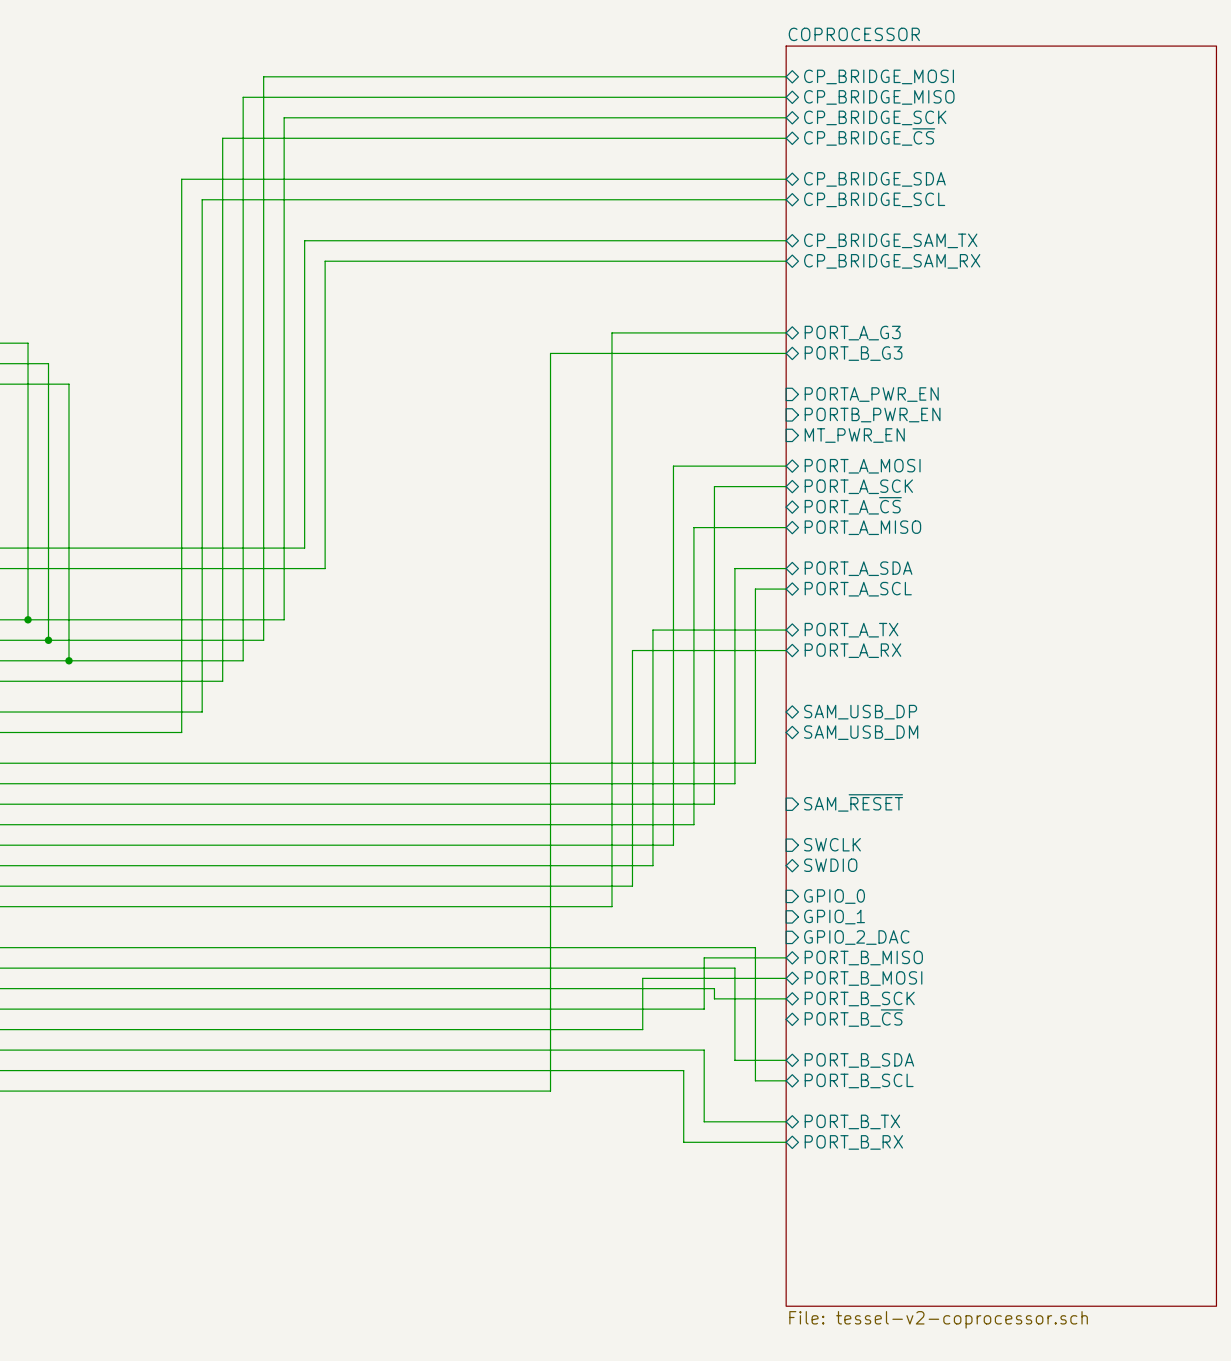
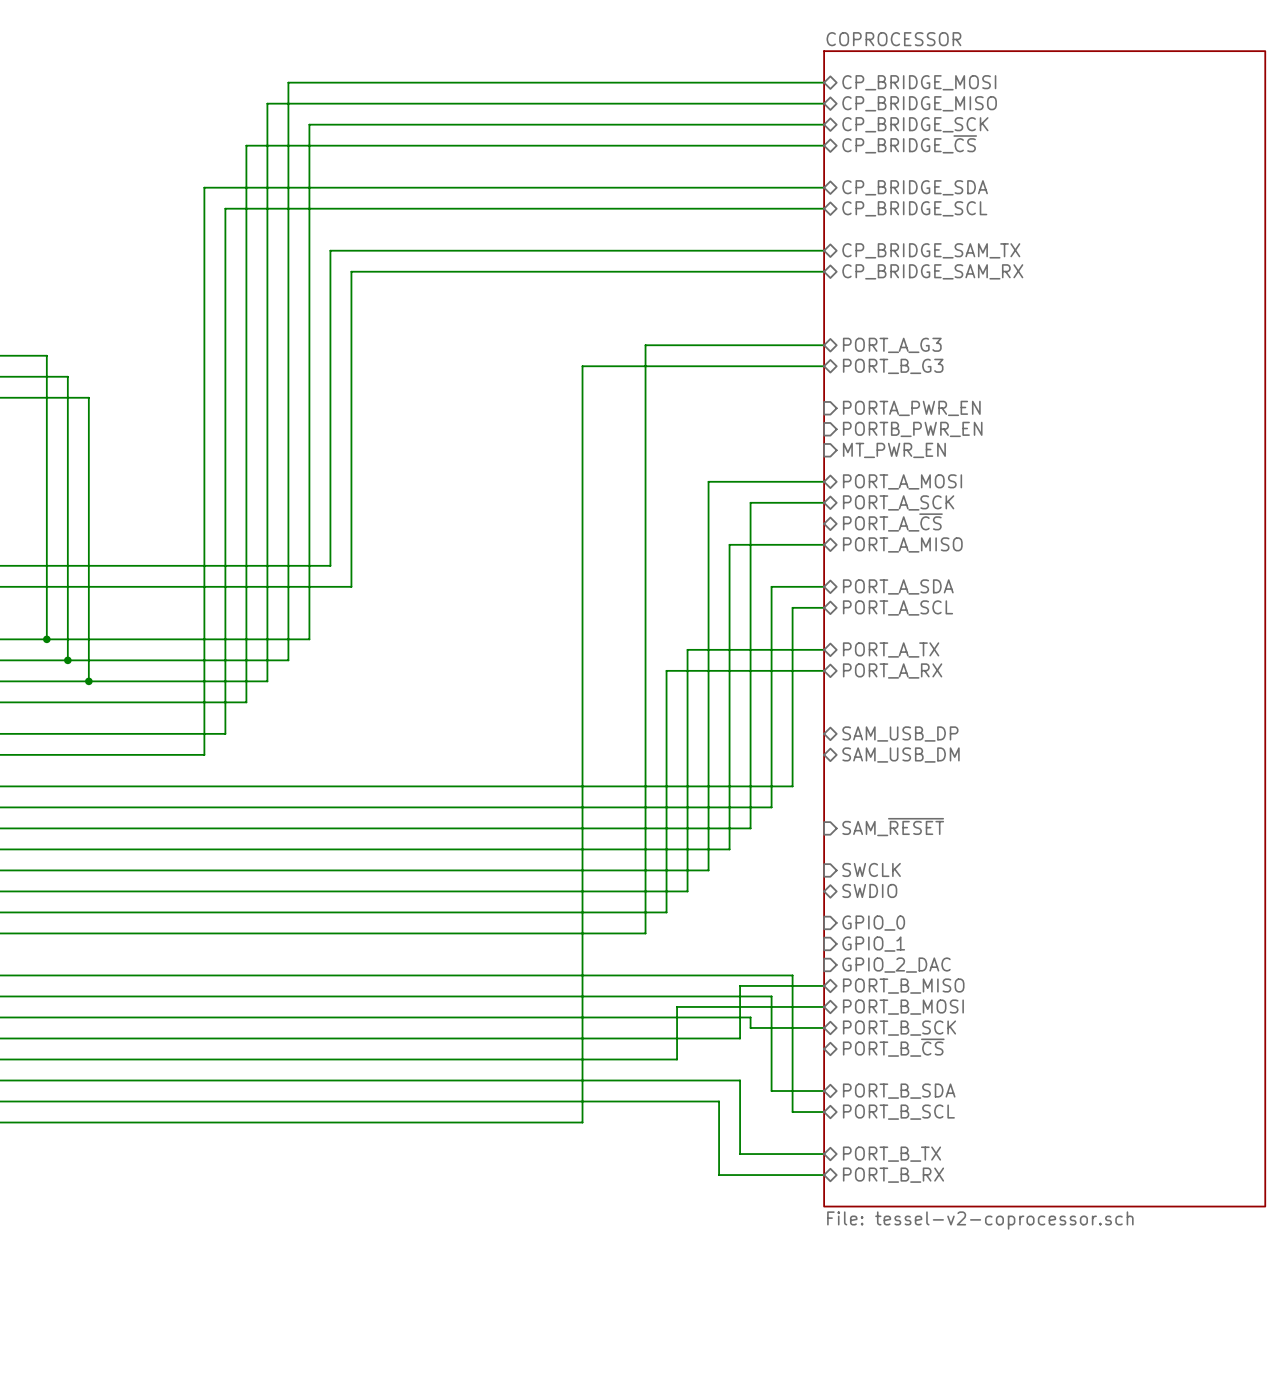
sheet COPROCESSOR: none -> File: tessel-v2-coprocessor.sch (1044, 628)
sheet COPROCESSOR: File: tessel-v2-coprocessor.sch (1001, 676) -> none

